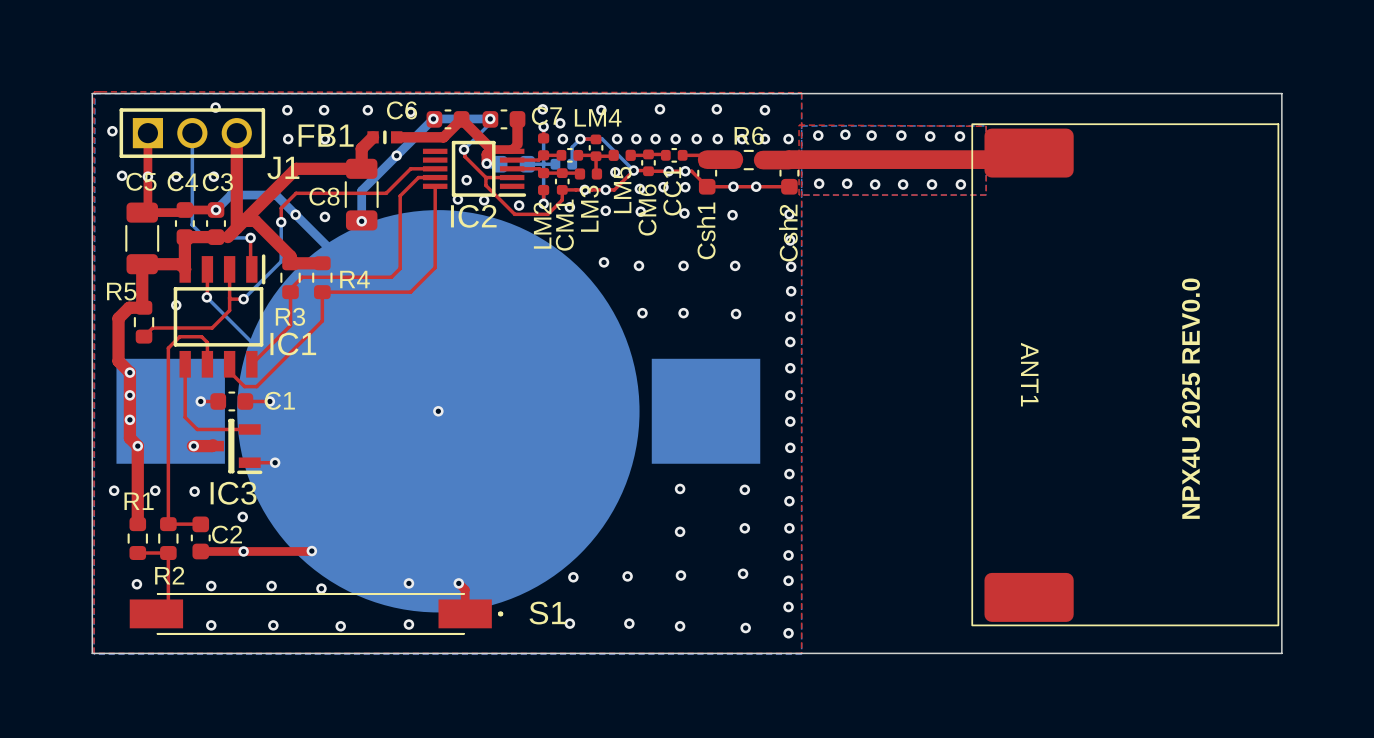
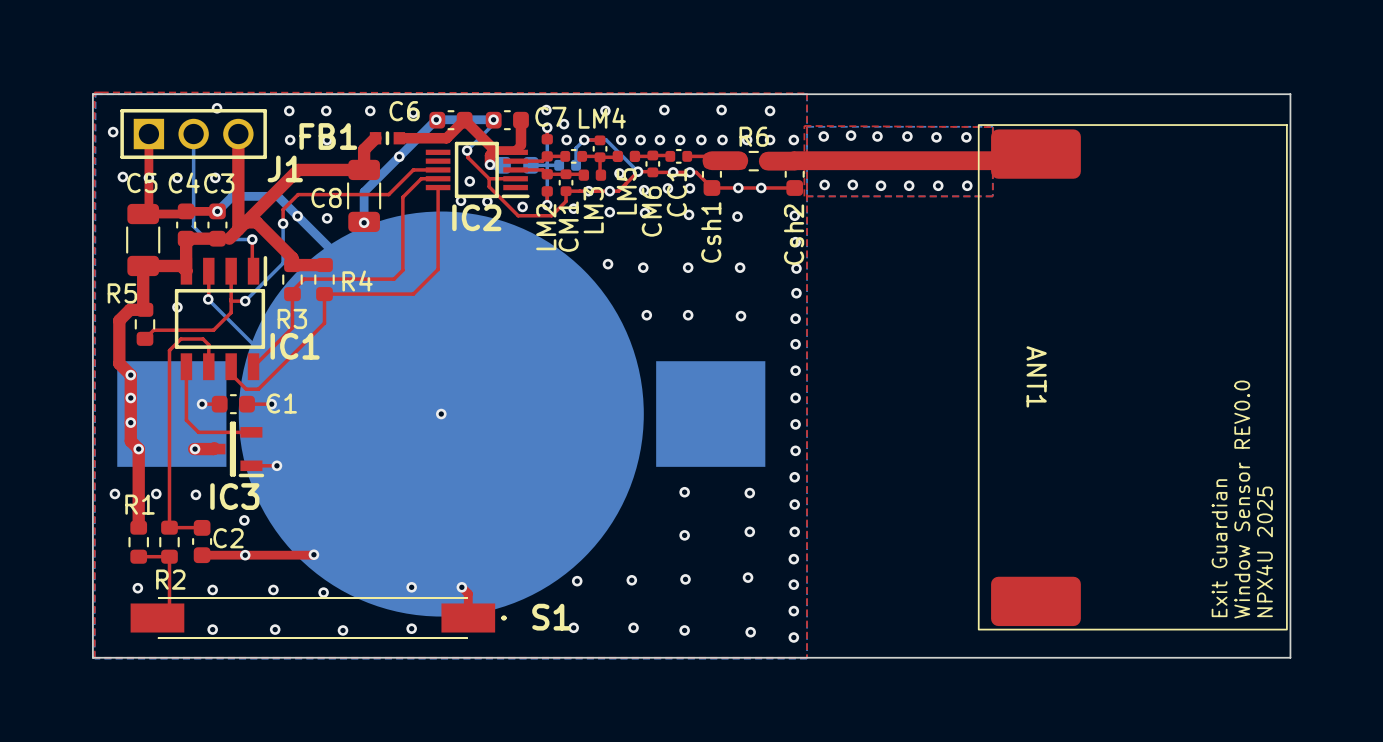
text: NPX4U 2025 REV0.0 (1191, 398) -> none
text: none -> Window Sensor REV0.0 (1242, 499)
text: none -> Exit Guardian (1219, 548)
text: none -> NPX4U 2025 (1264, 551)

